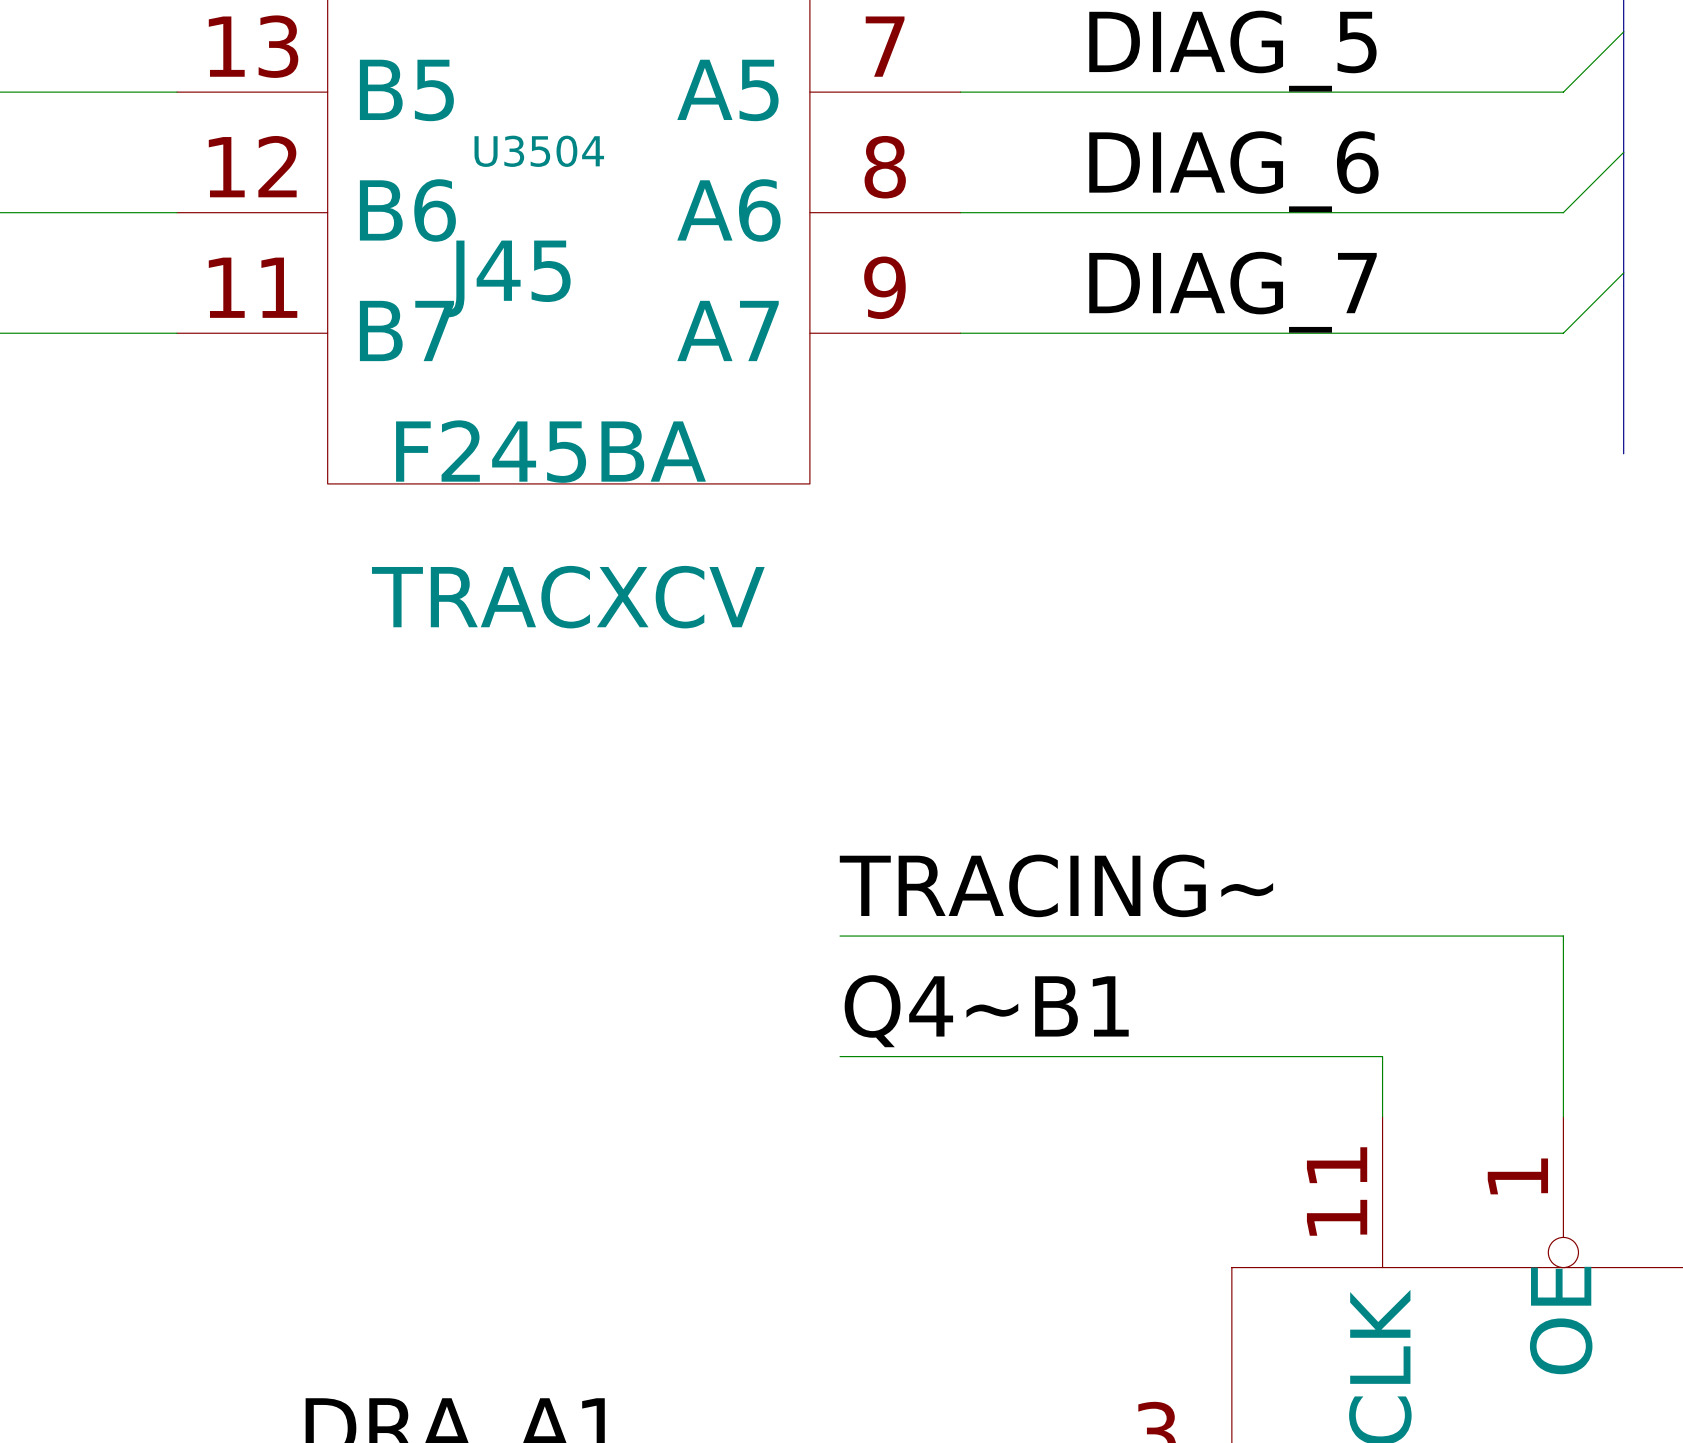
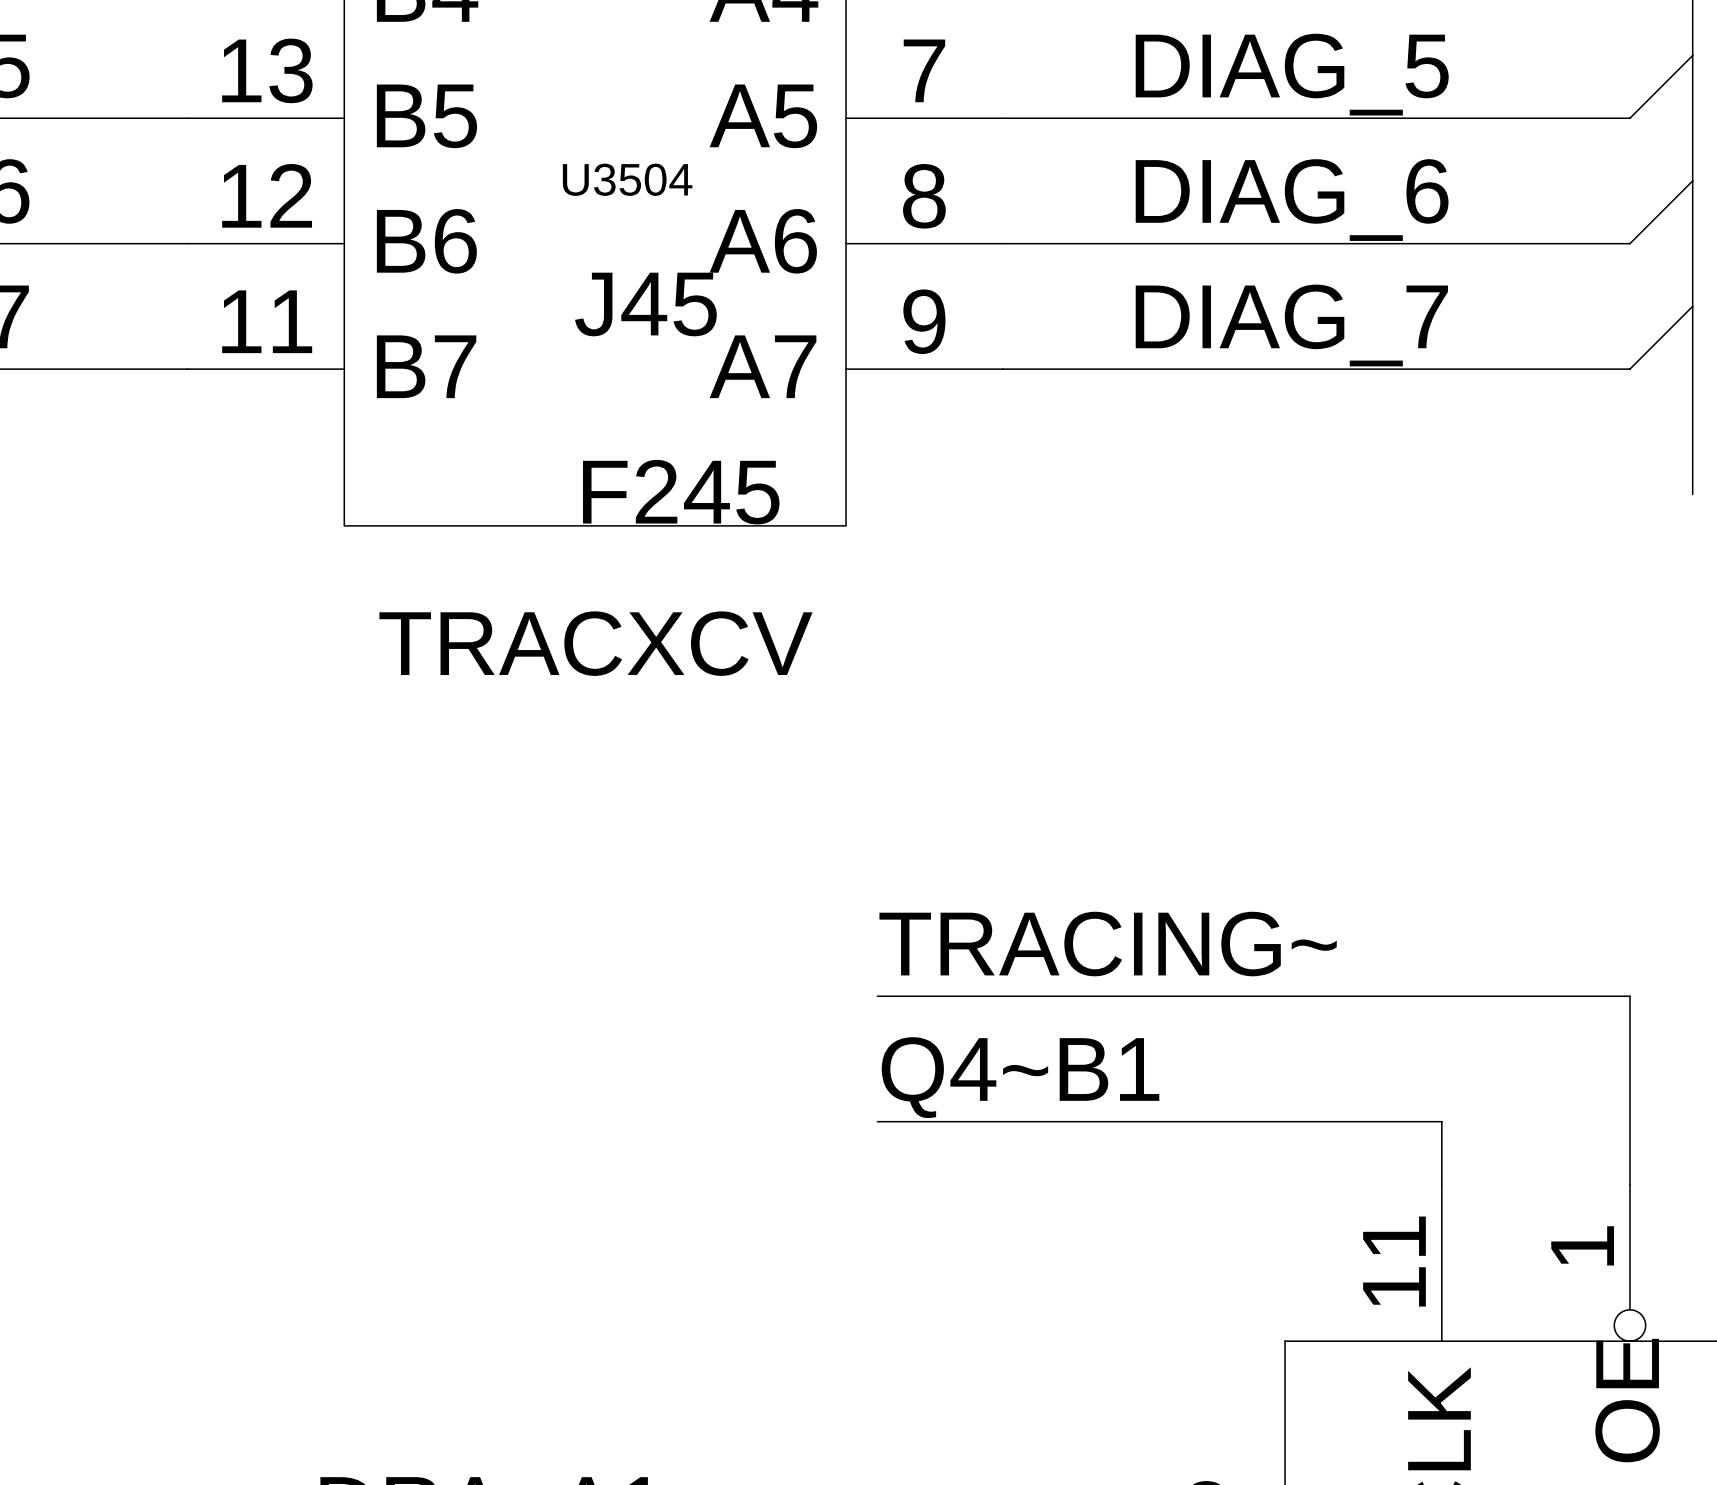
U3504 name position: U3504 (539, 151) -> U3504 (627, 179)
U3504 text position: J45 (507, 278) -> J45 (645, 304)
U3504 value: F245BA (550, 451) -> F245 (681, 492)

